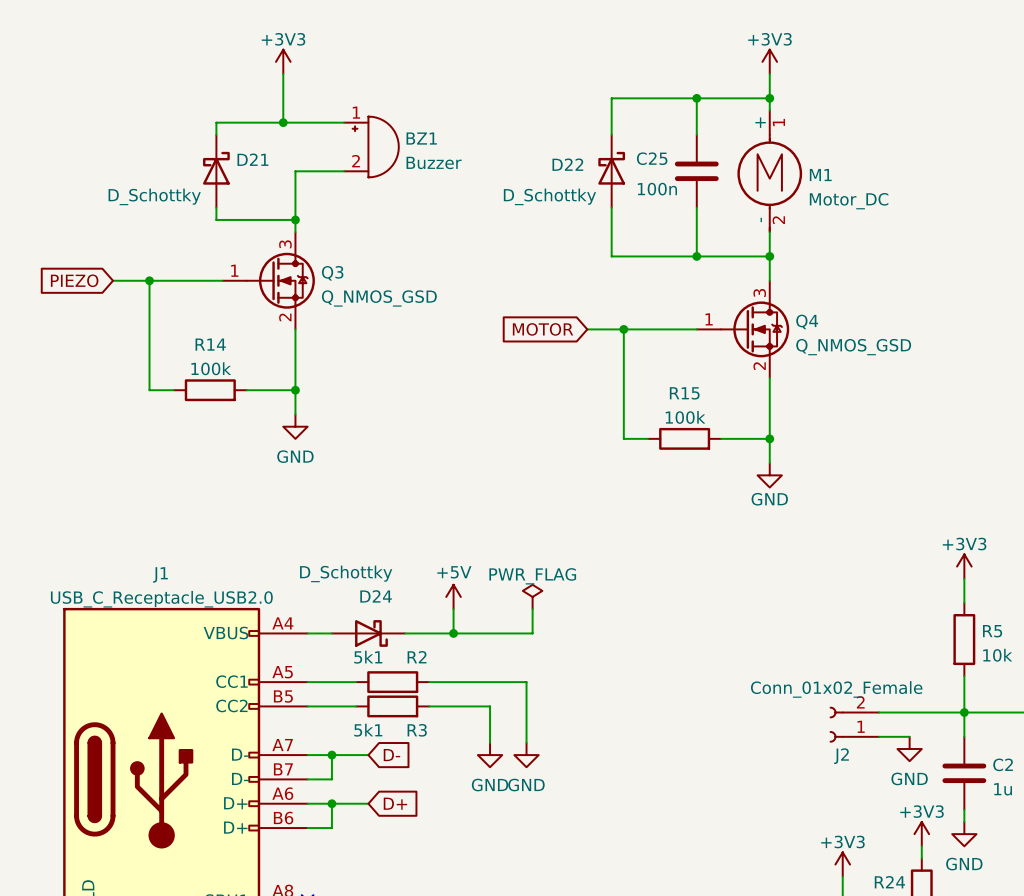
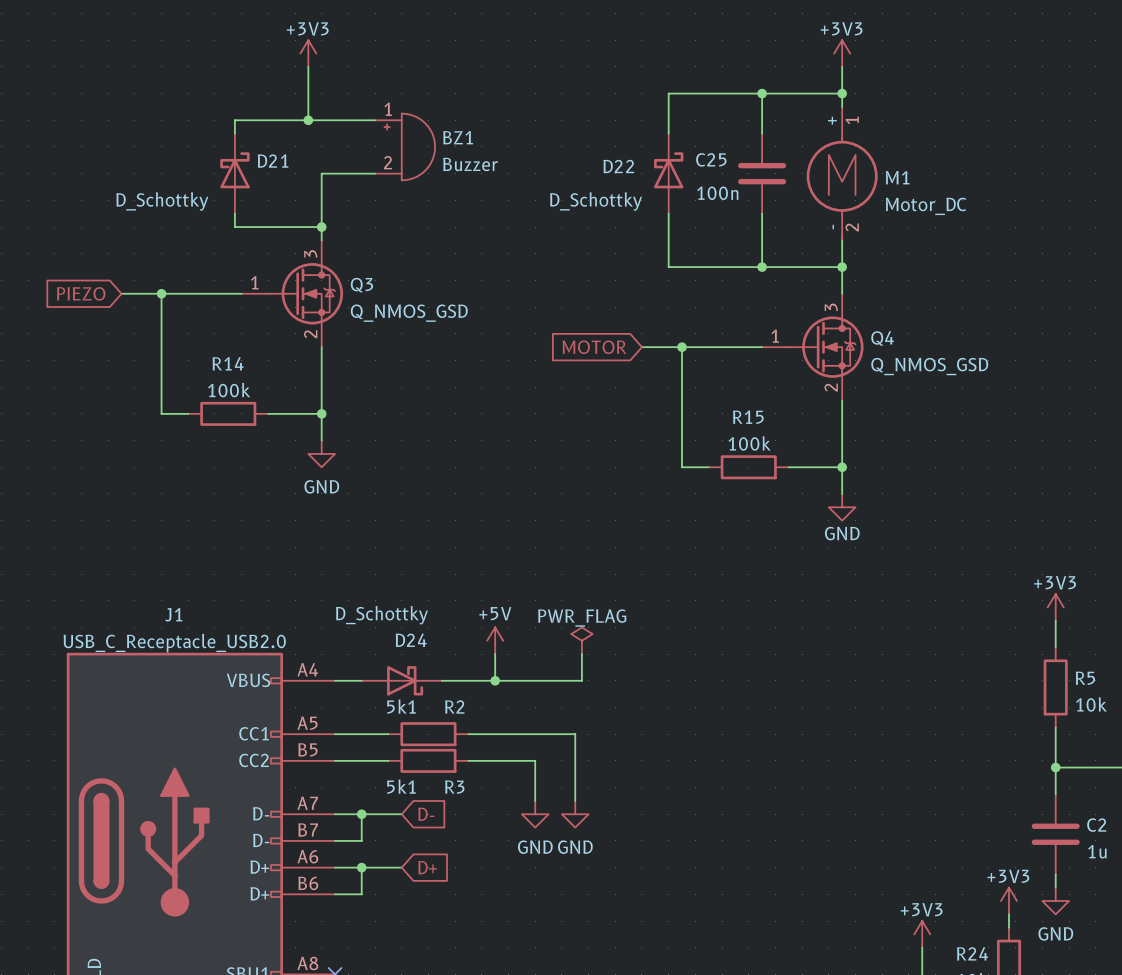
wire: (879, 712) (964, 712) -> none
J2: Conn_01x02_Female (854, 724) -> none
wire: (879, 736) (909, 736) -> none
power symbol: GND (909, 749) -> none

